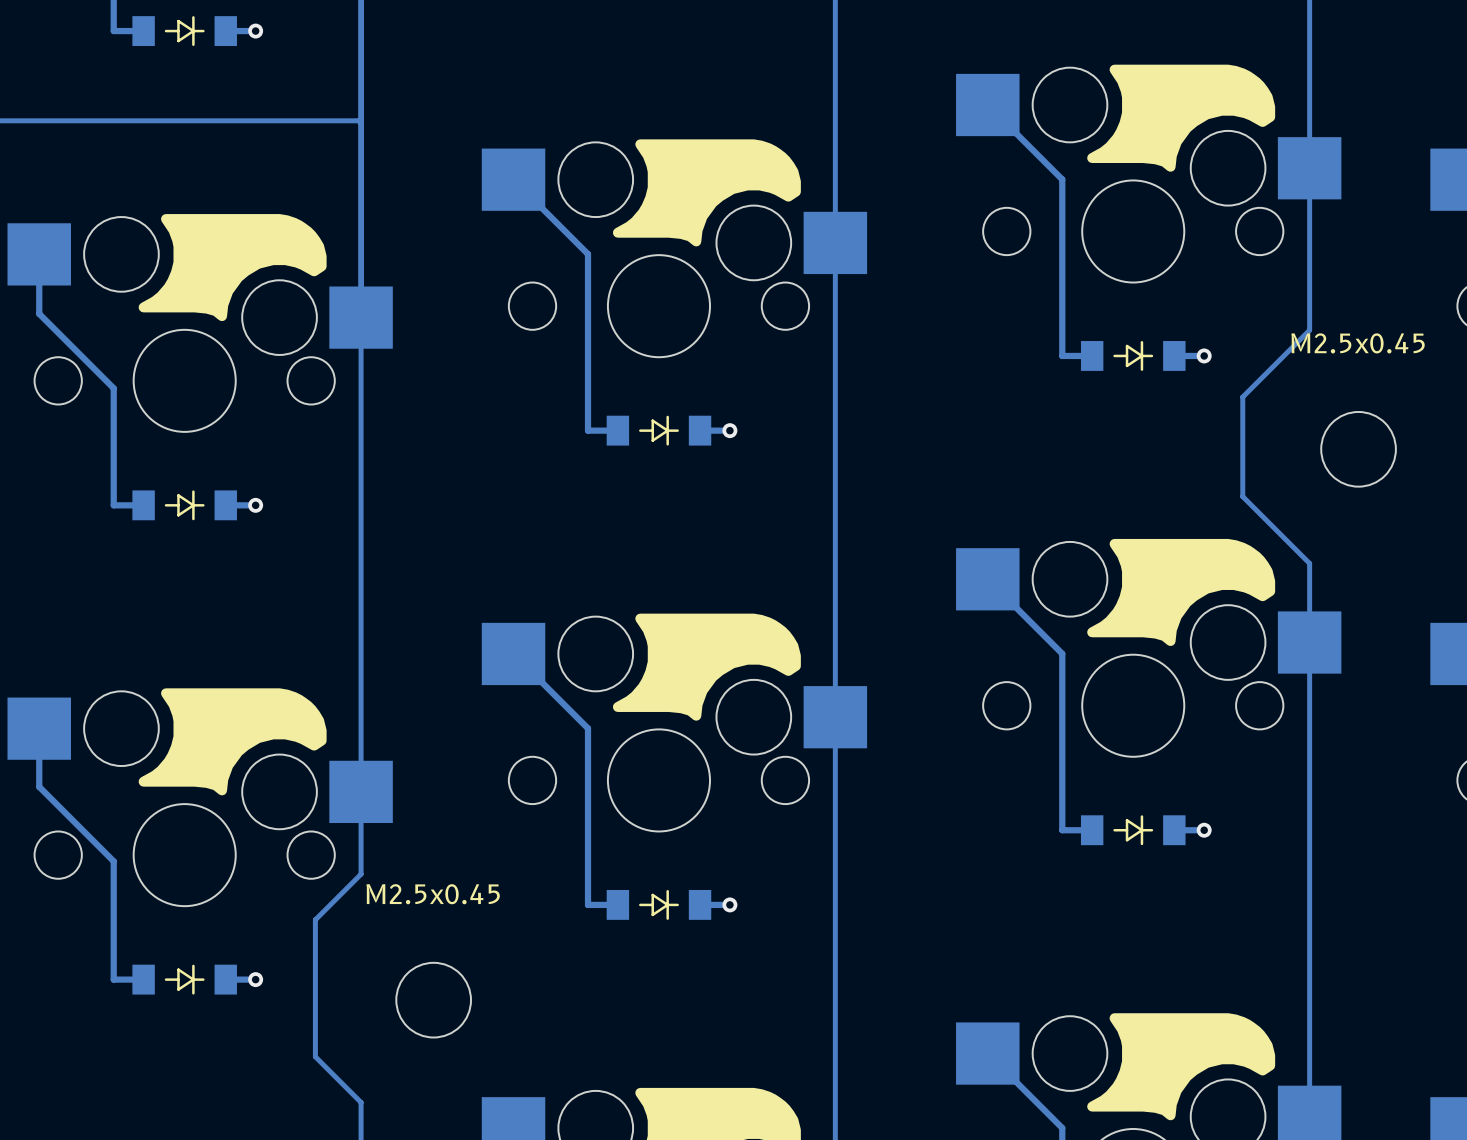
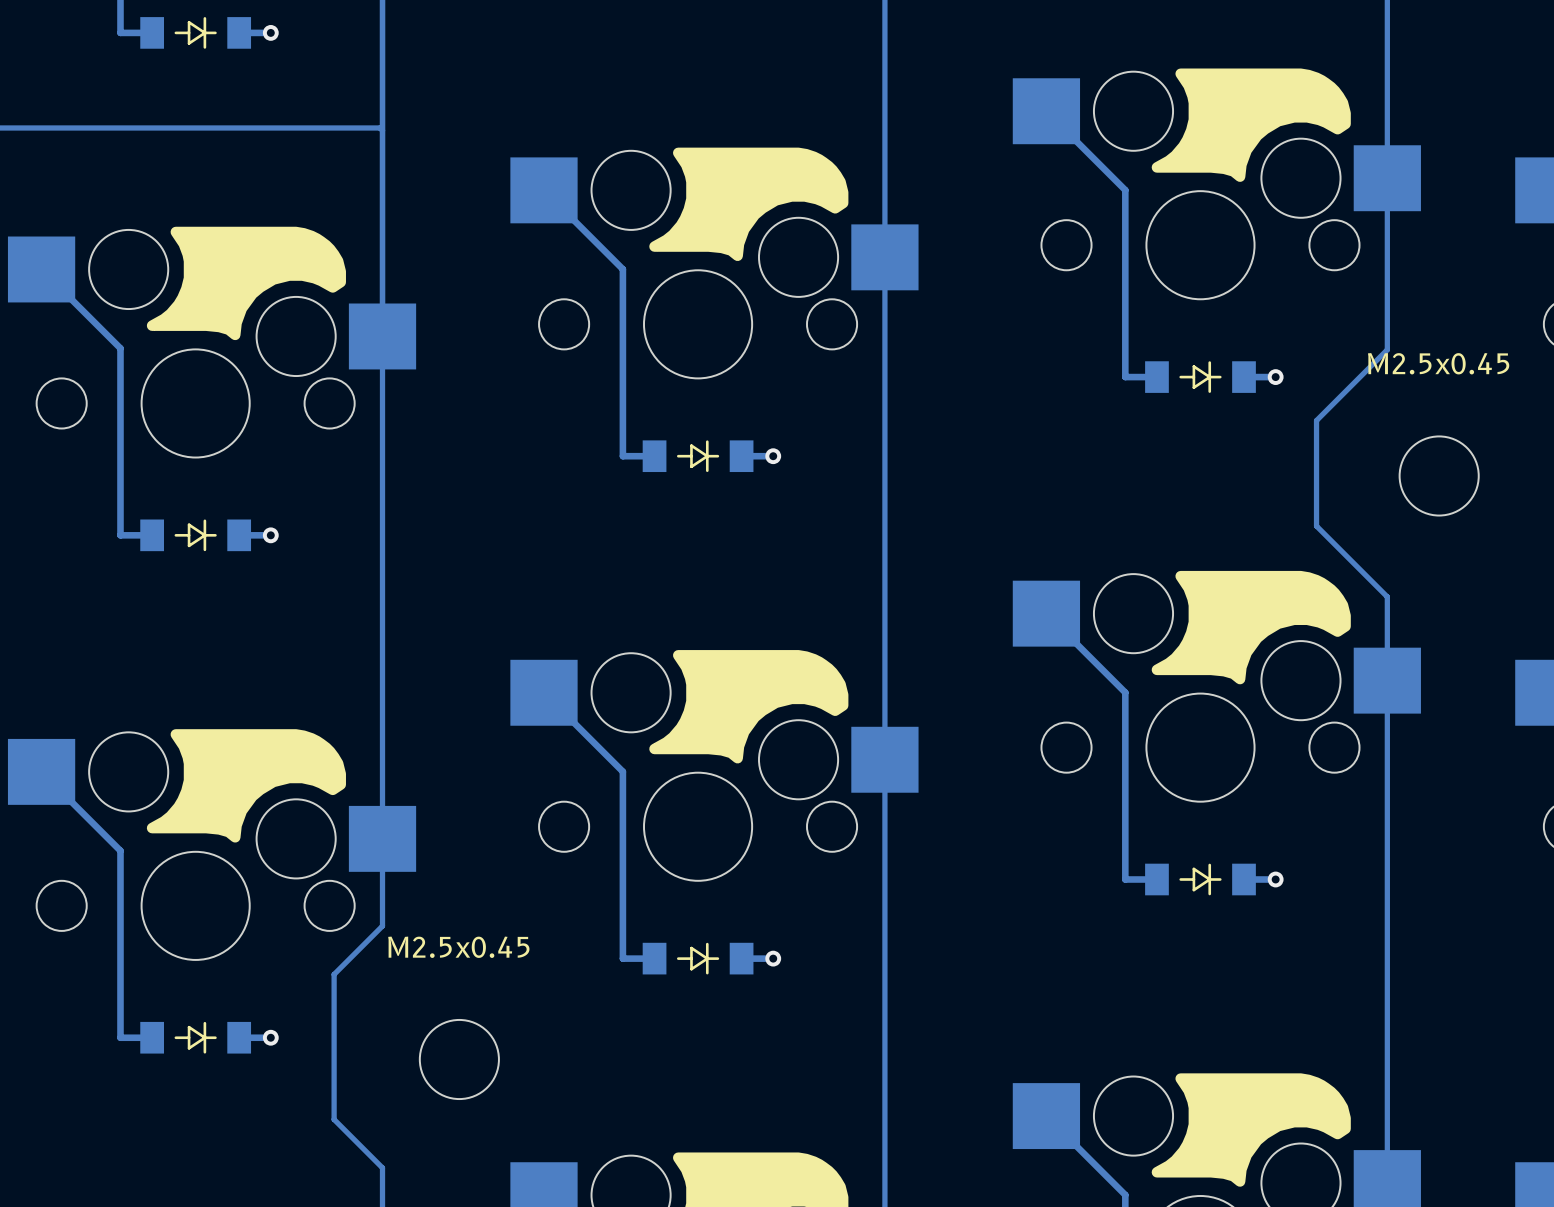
track: (39, 254) (39, 313) (113, 388) -> (41, 269) (120, 348) (120, 411)
track: (39, 728) (39, 786) (113, 861) -> (41, 771) (120, 850) (120, 912)

